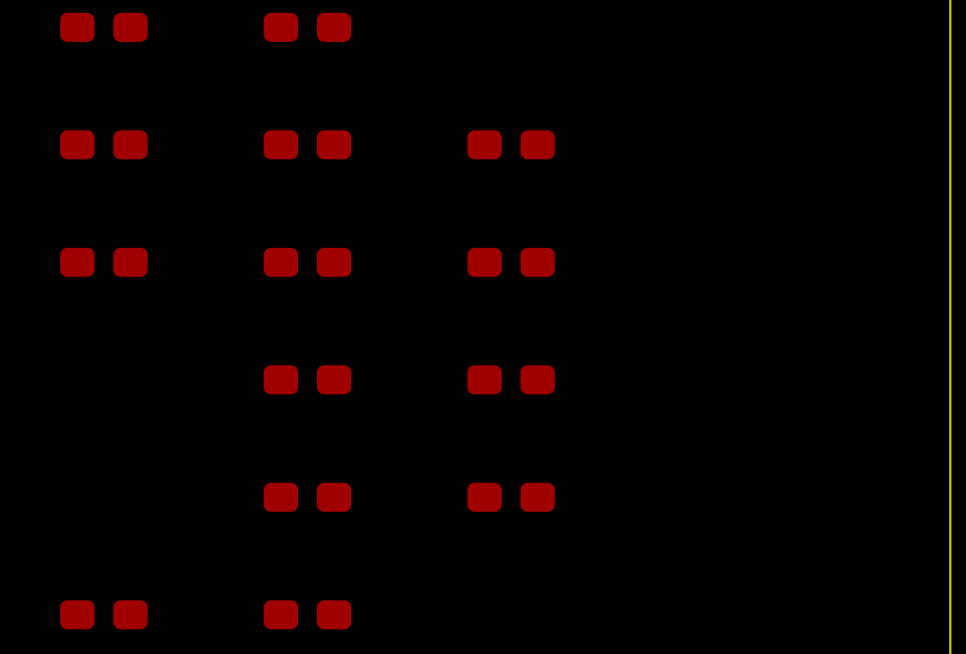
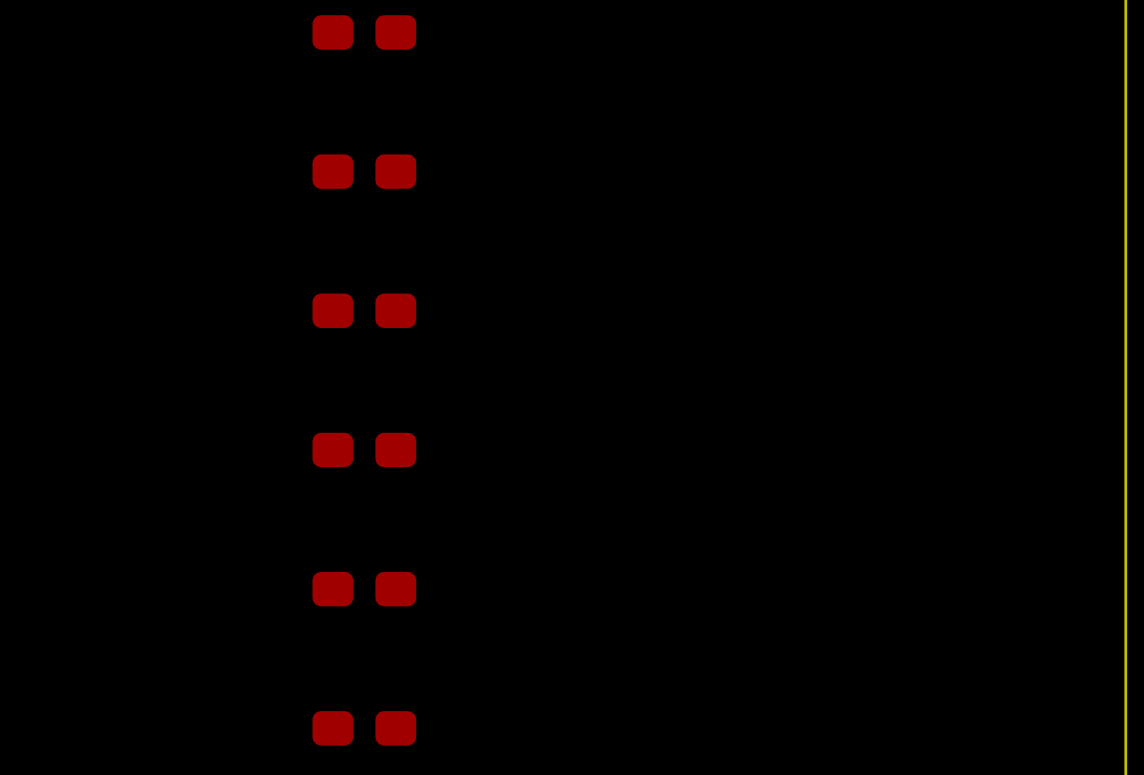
part: (103, 27) -> none
part: (103, 144) -> none
part: (511, 144) -> none
part: (103, 262) -> none
part: (511, 262) -> none
part: (511, 379) -> none
part: (511, 497) -> none
part: (103, 614) -> none

